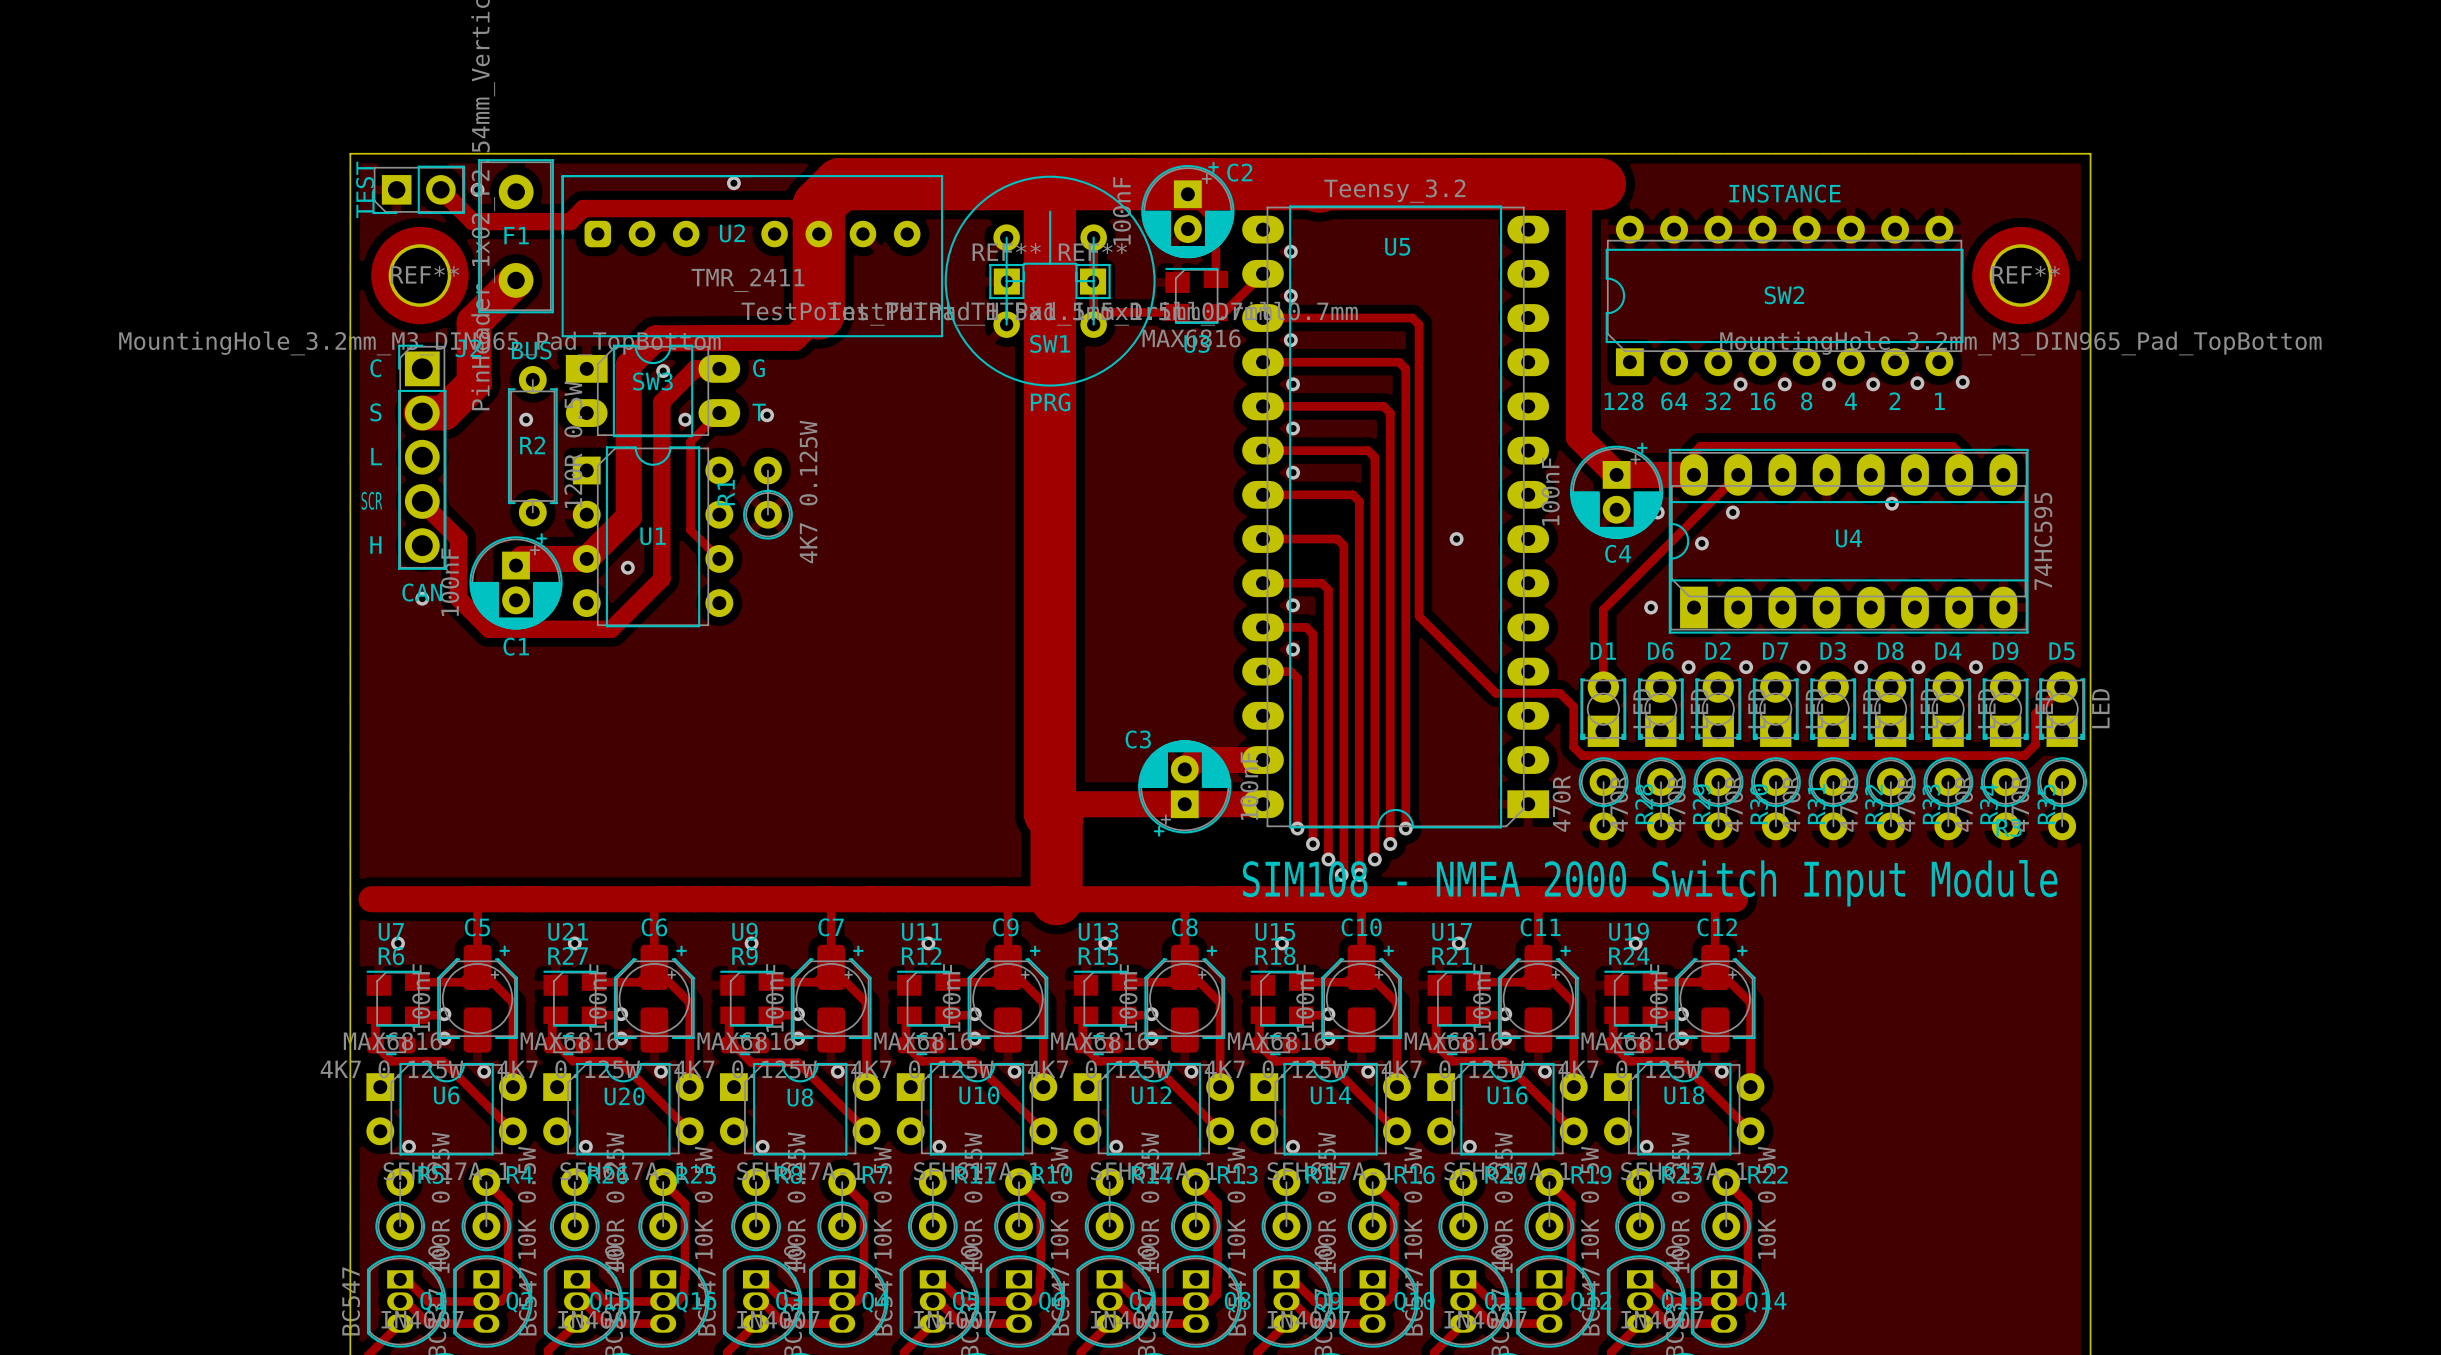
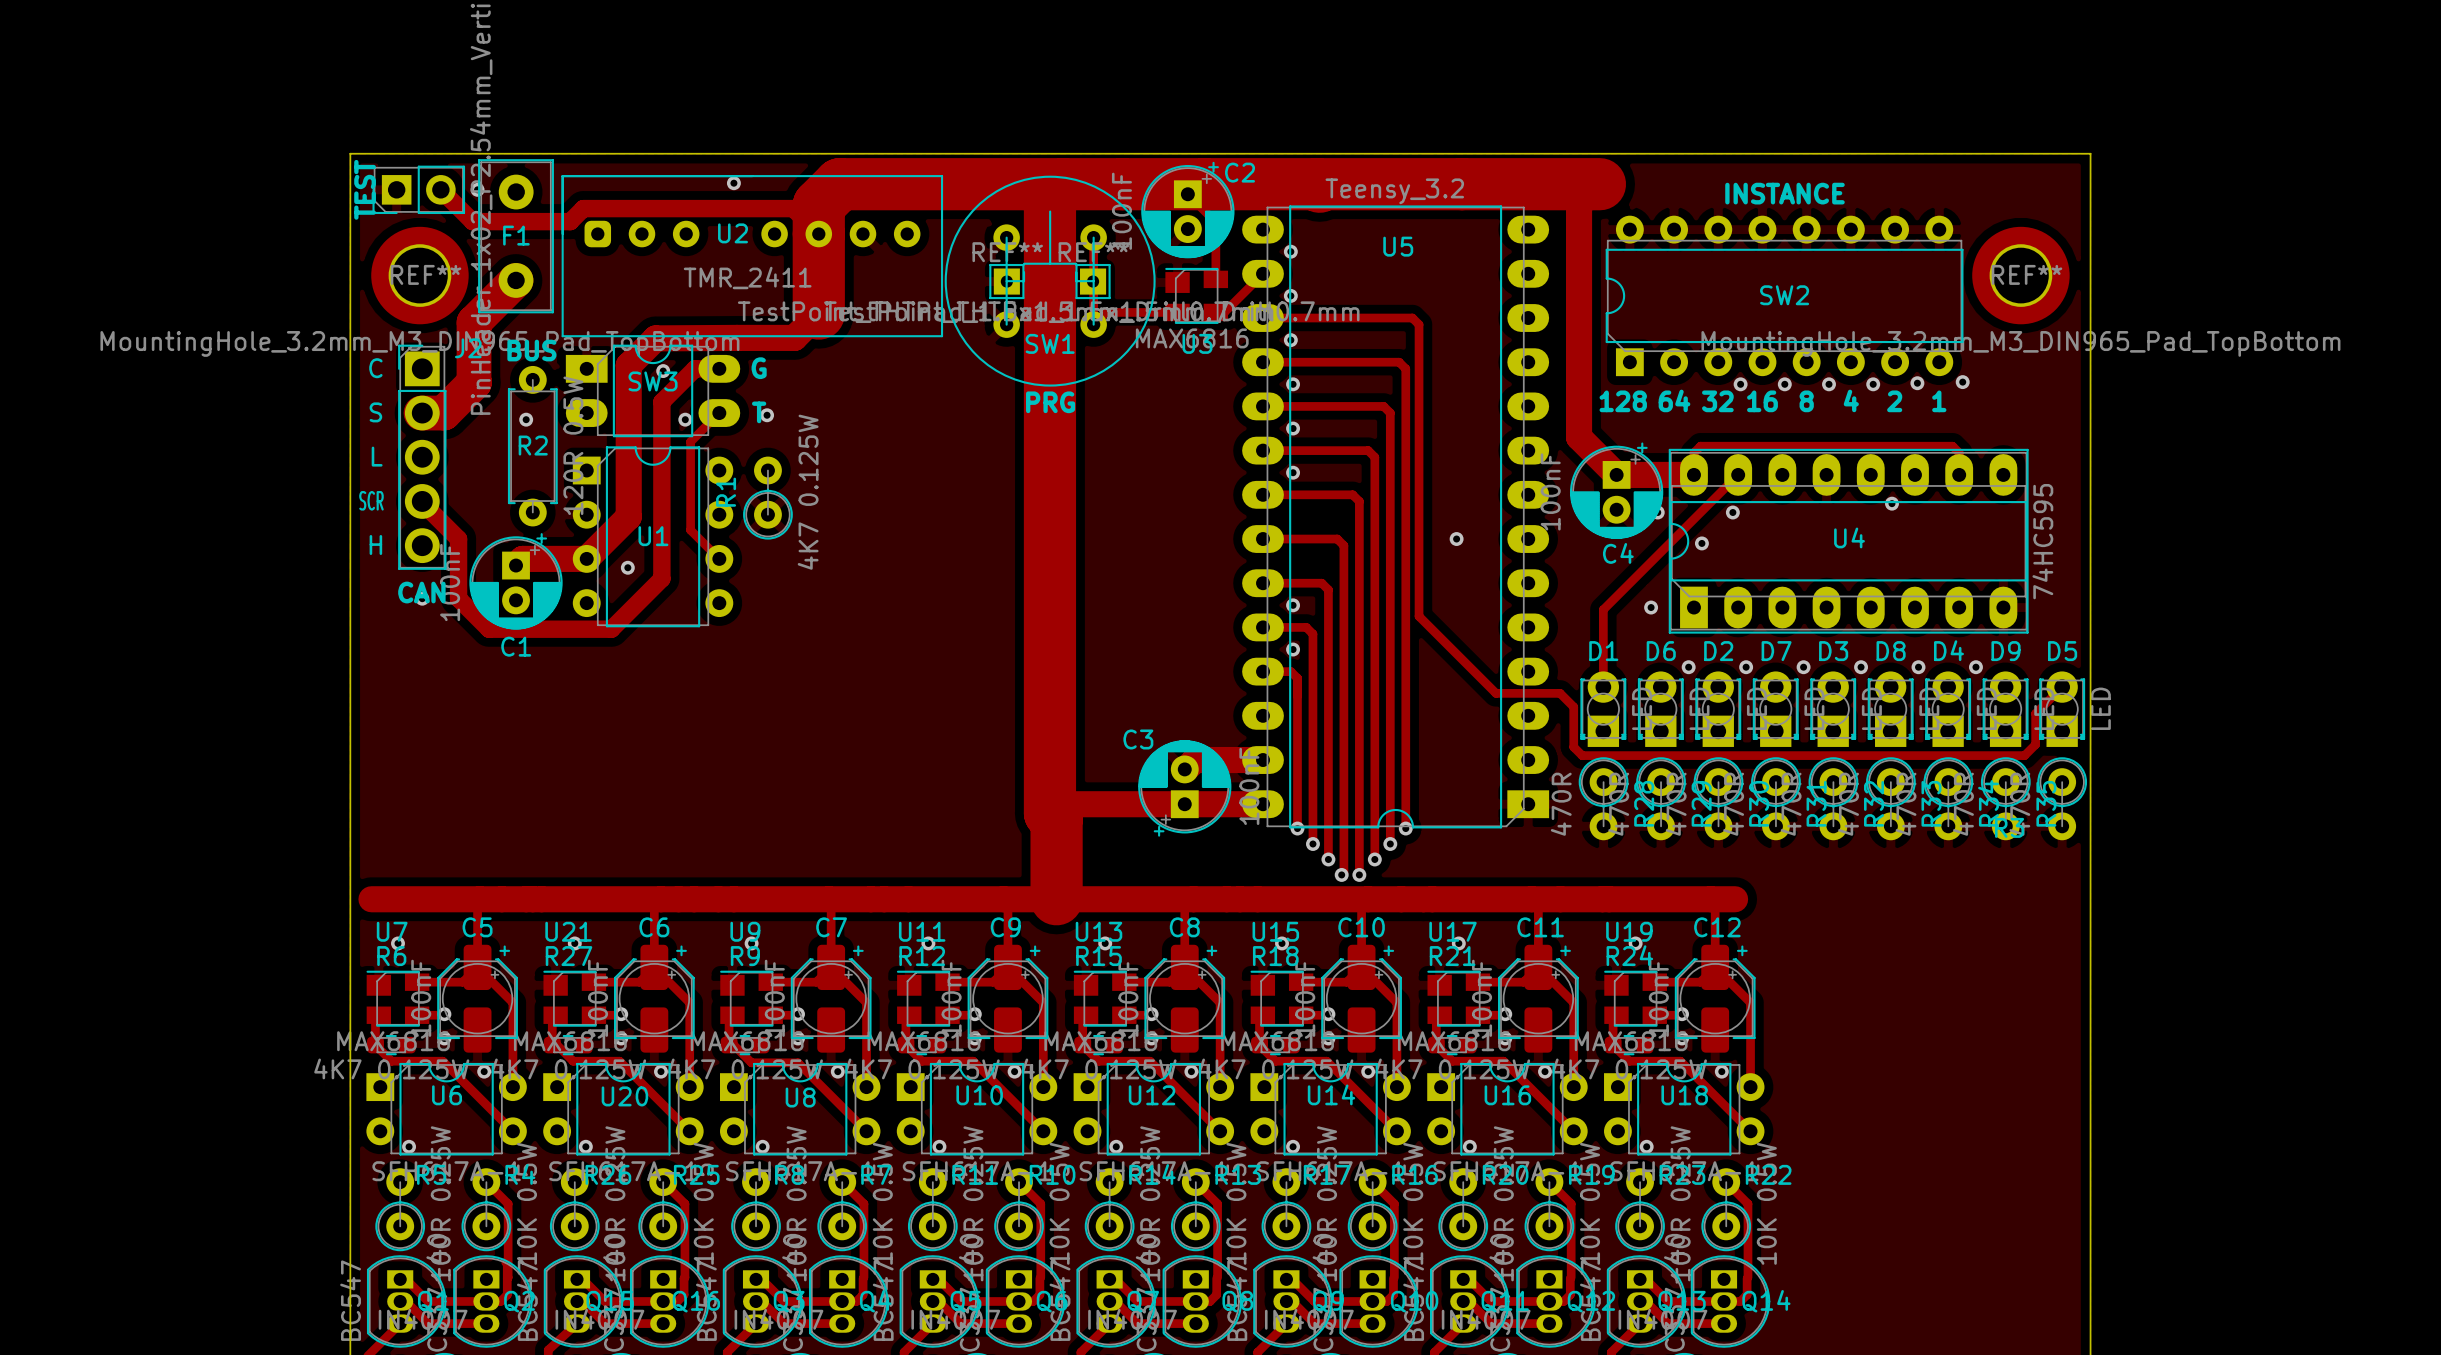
text: SIM108 - NMEA 2000 Switch Input Module (1650, 883) -> none

